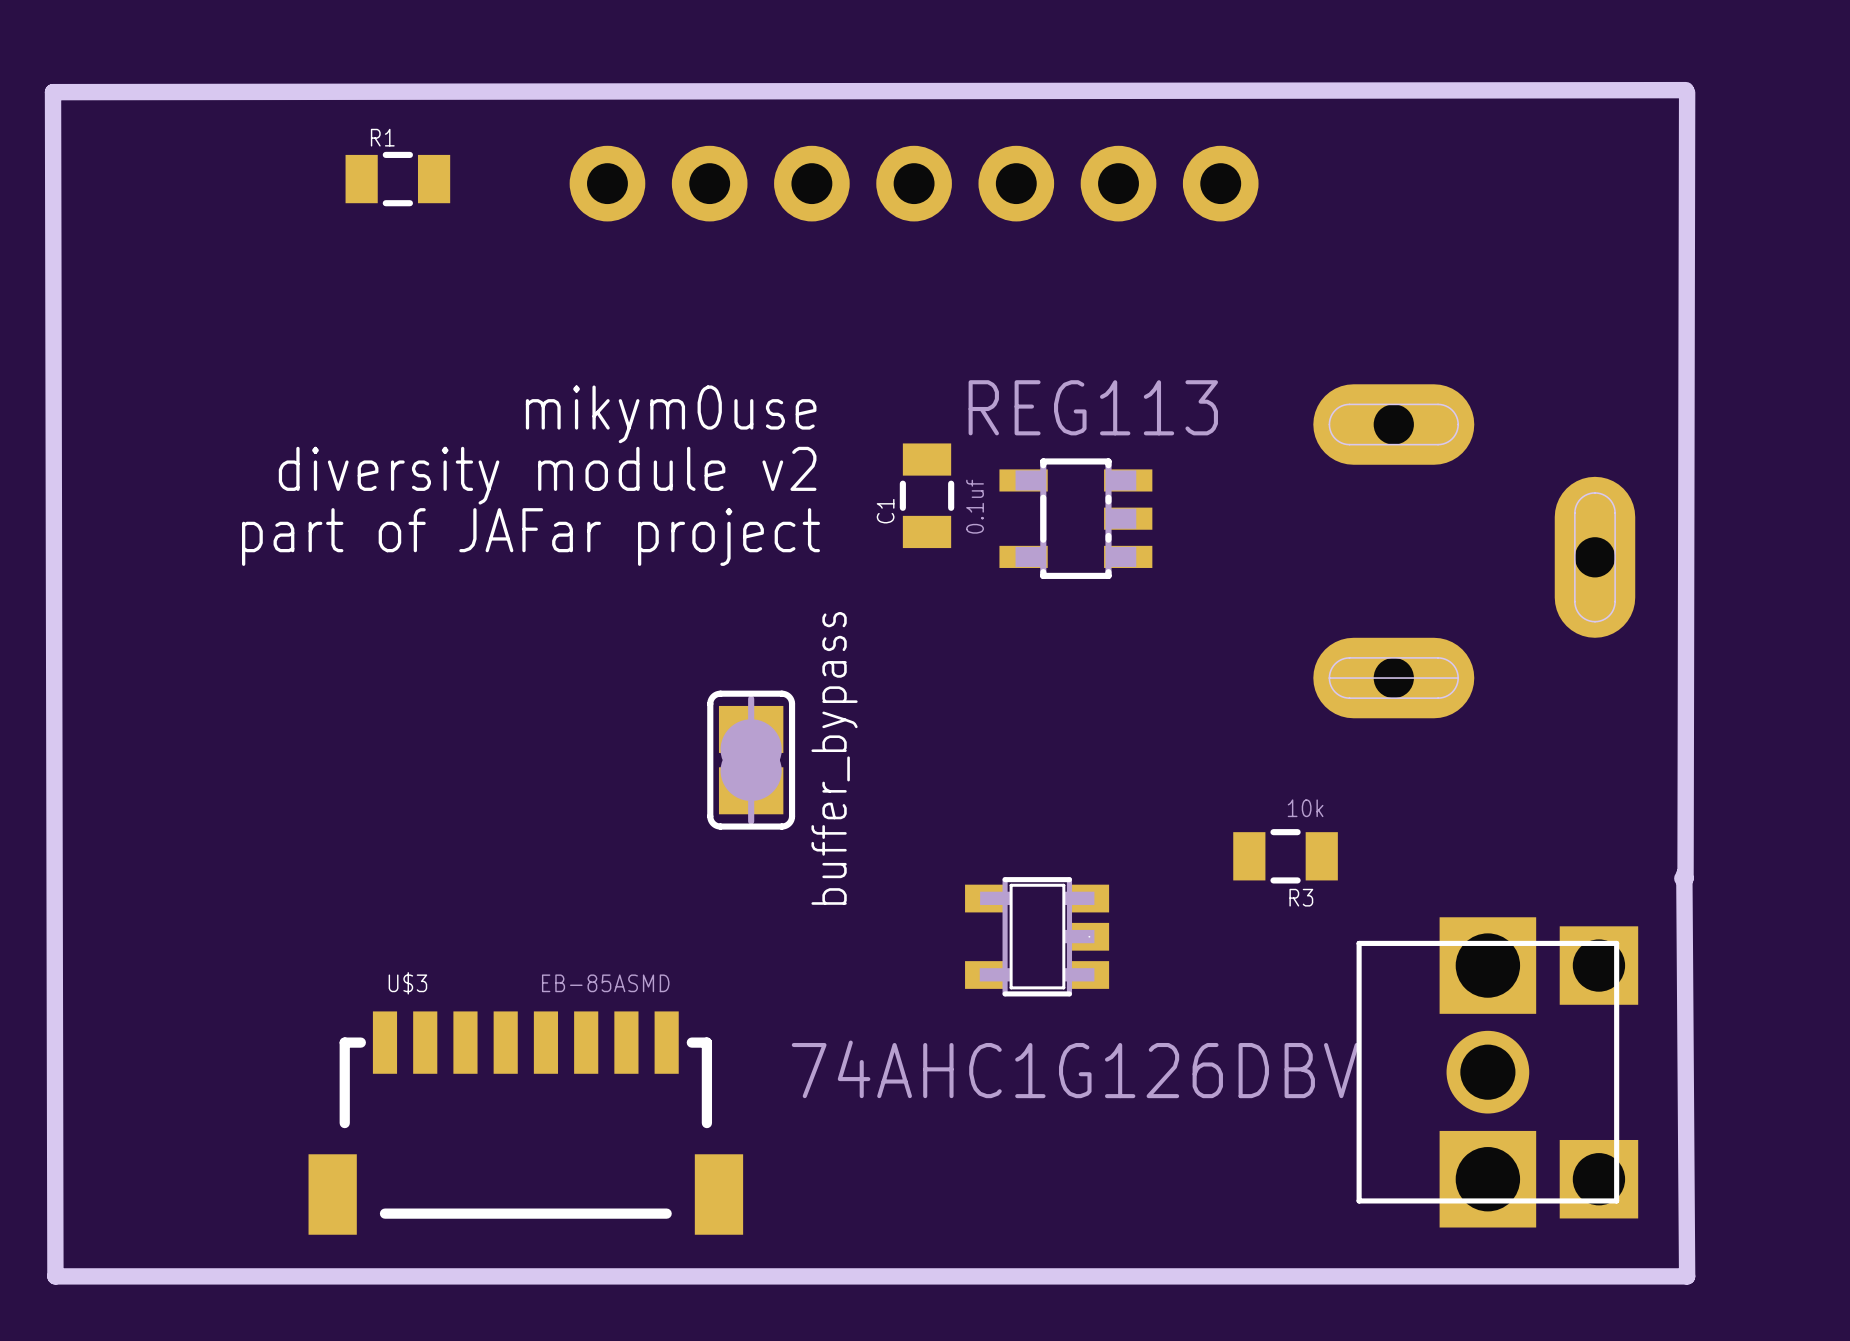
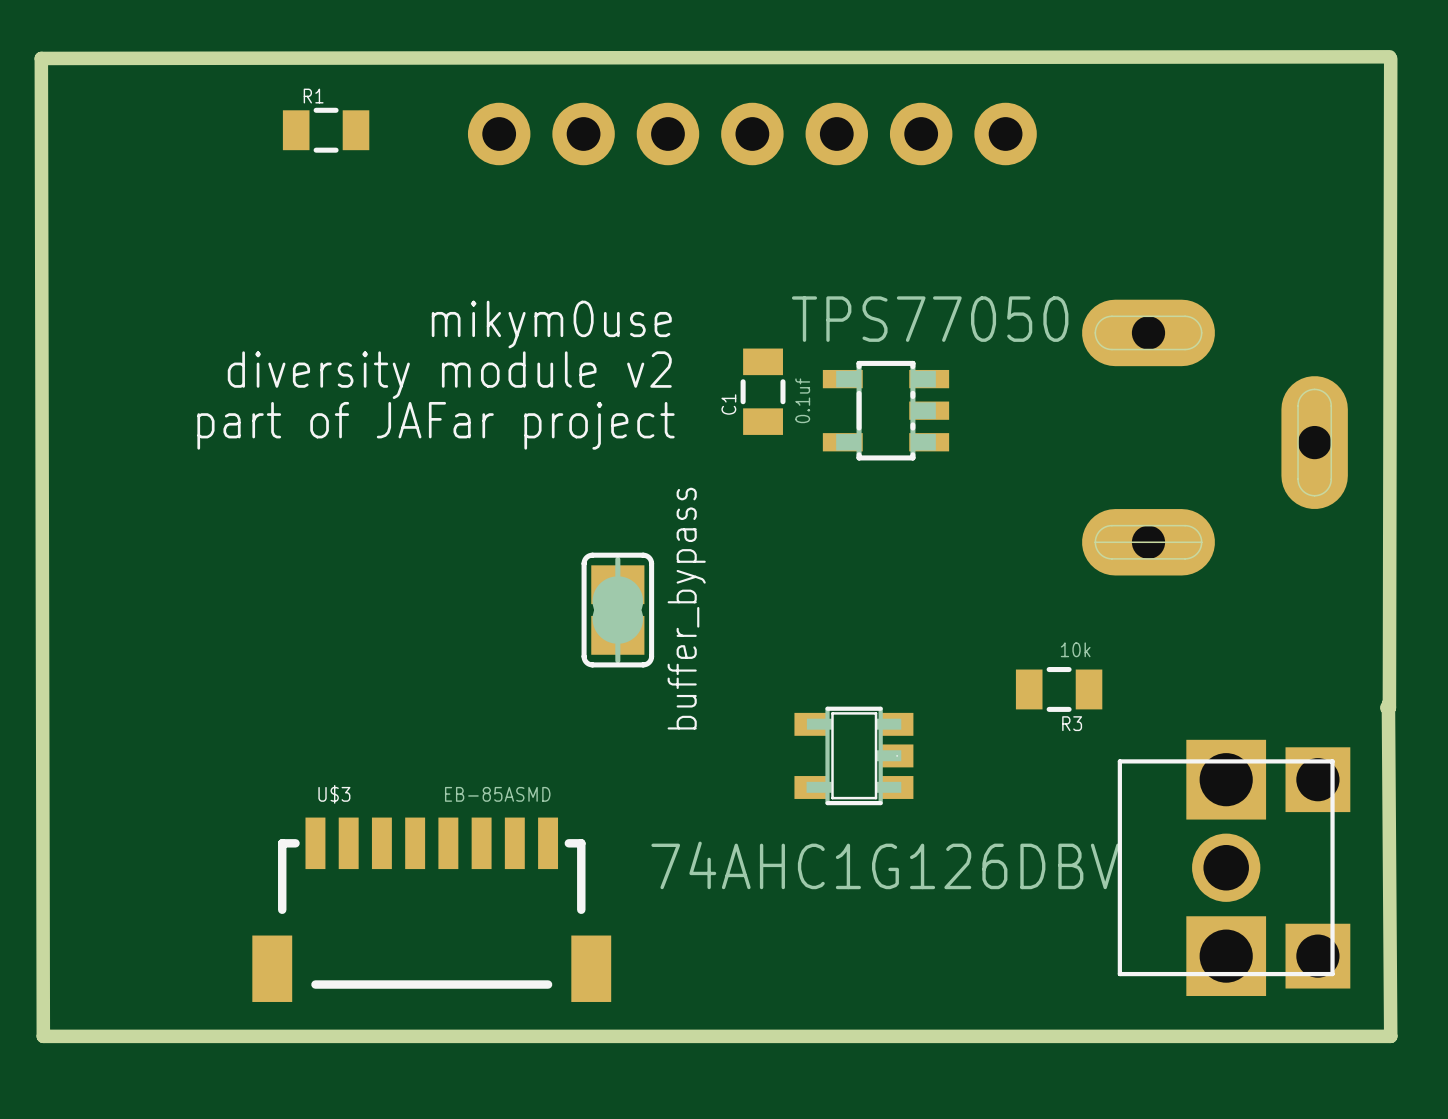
part value: REG113 (1093, 407) -> TPS77050 (930, 319)

